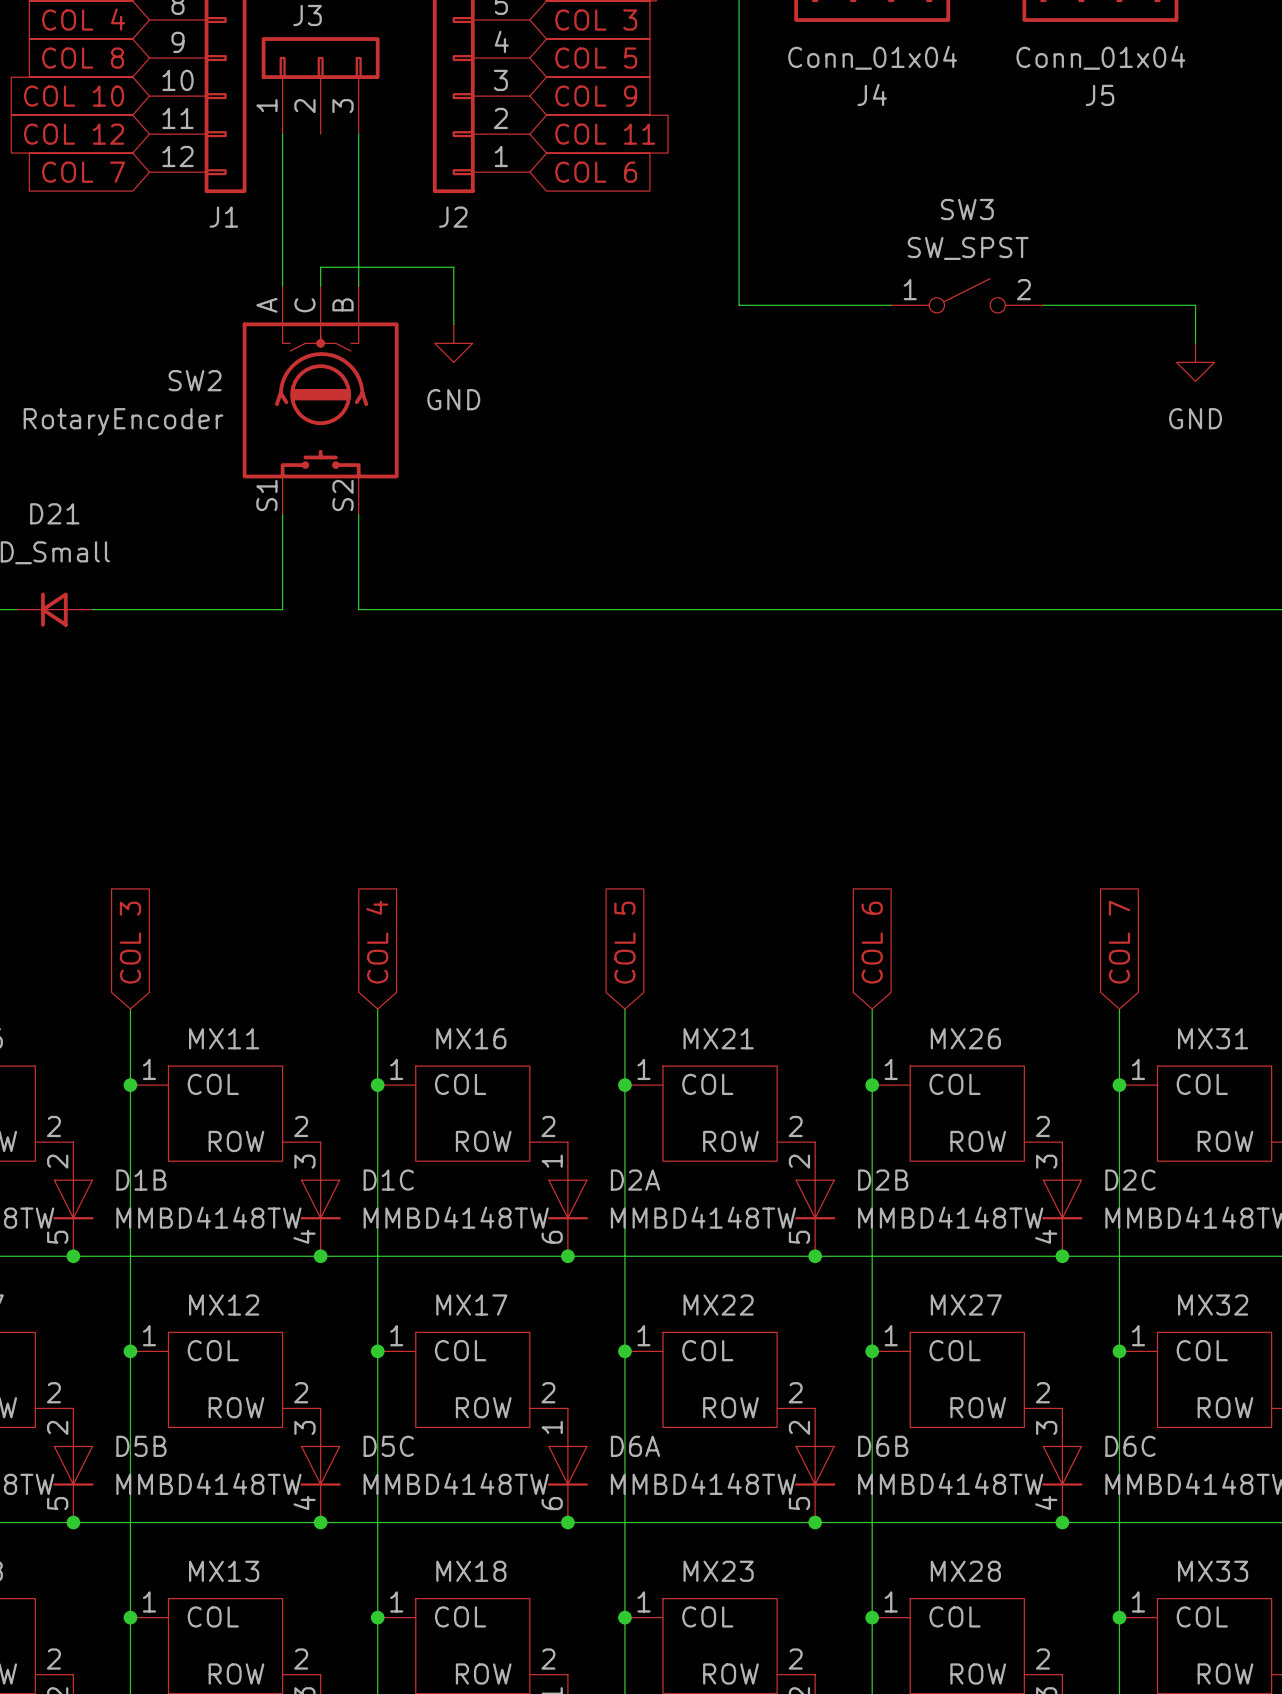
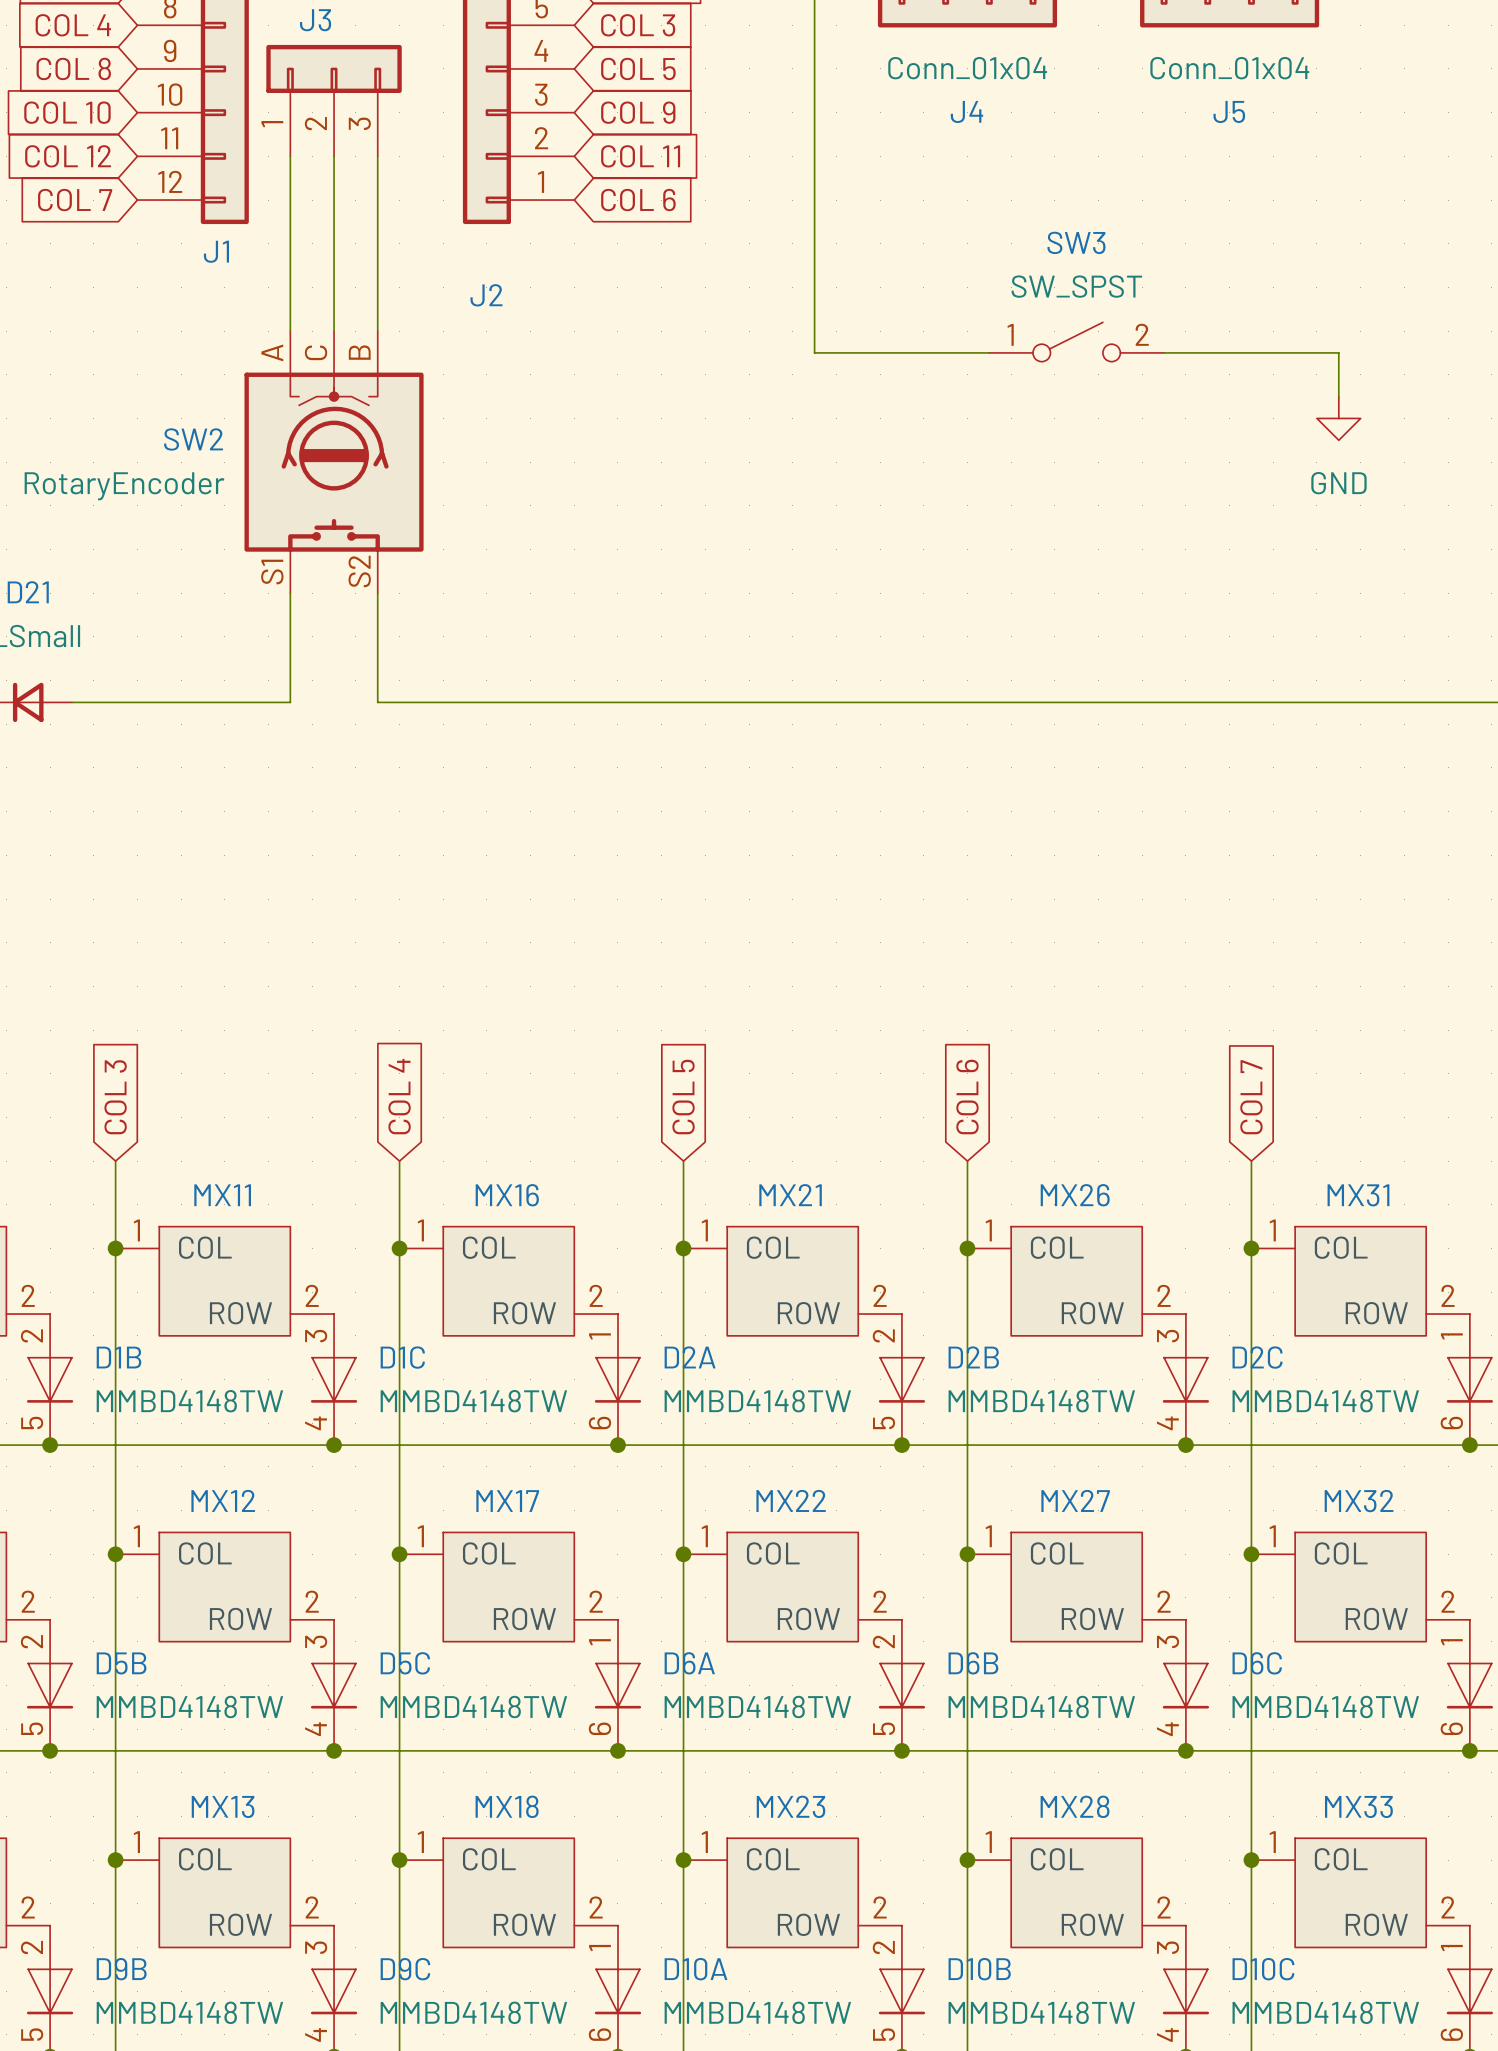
J2 name position: J2 (453, 217) -> J2 (486, 295)
wire: (320, 267) (453, 267) (453, 324) -> (334, 309) (334, 156)
power symbol: GND (453, 343) -> none

